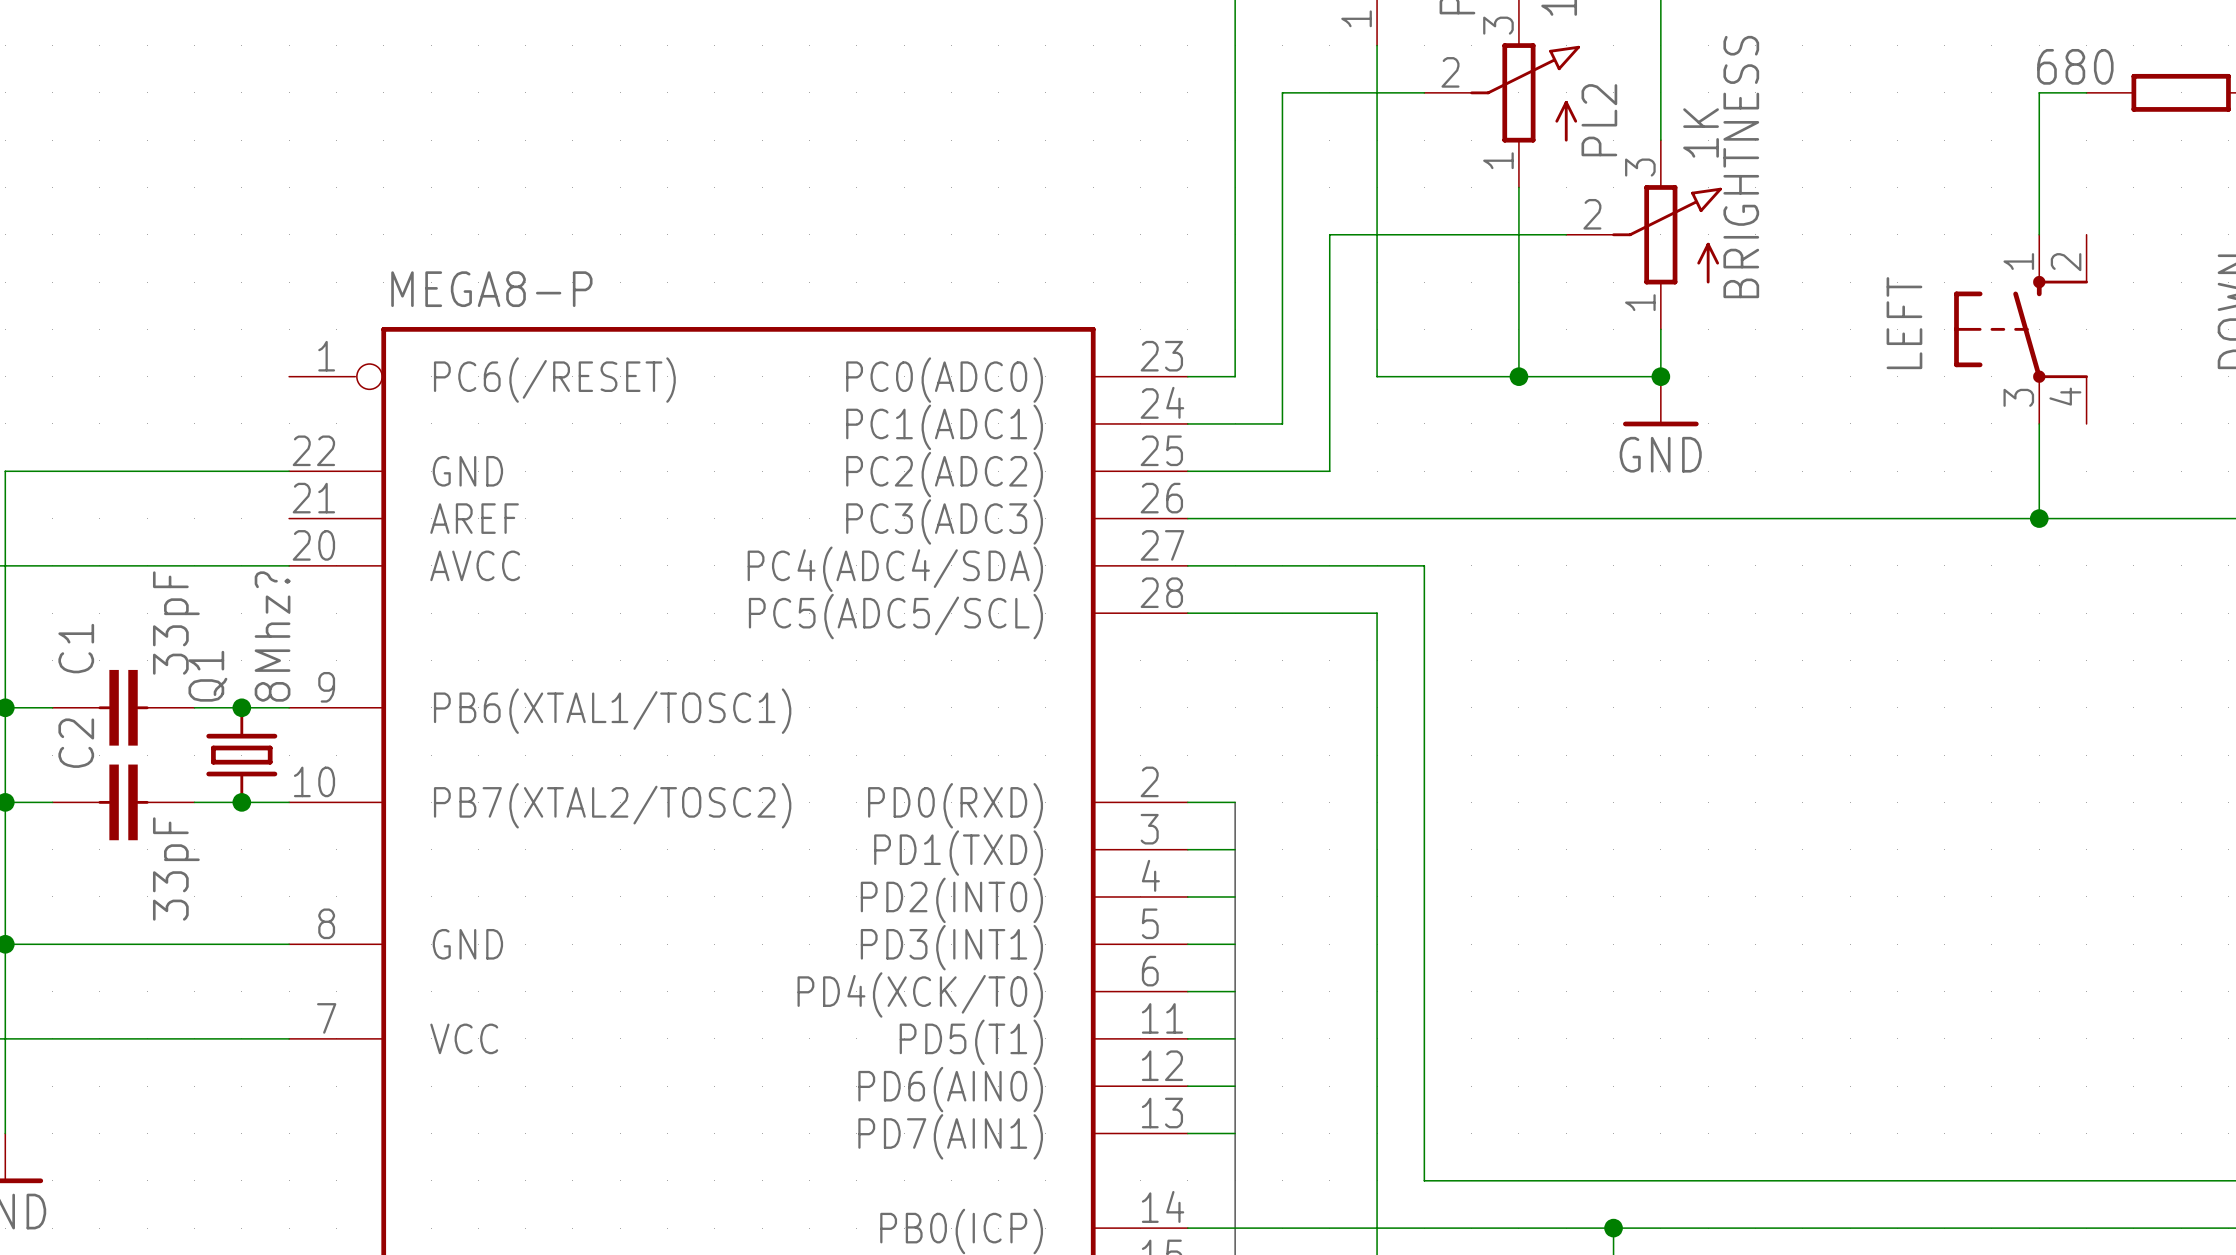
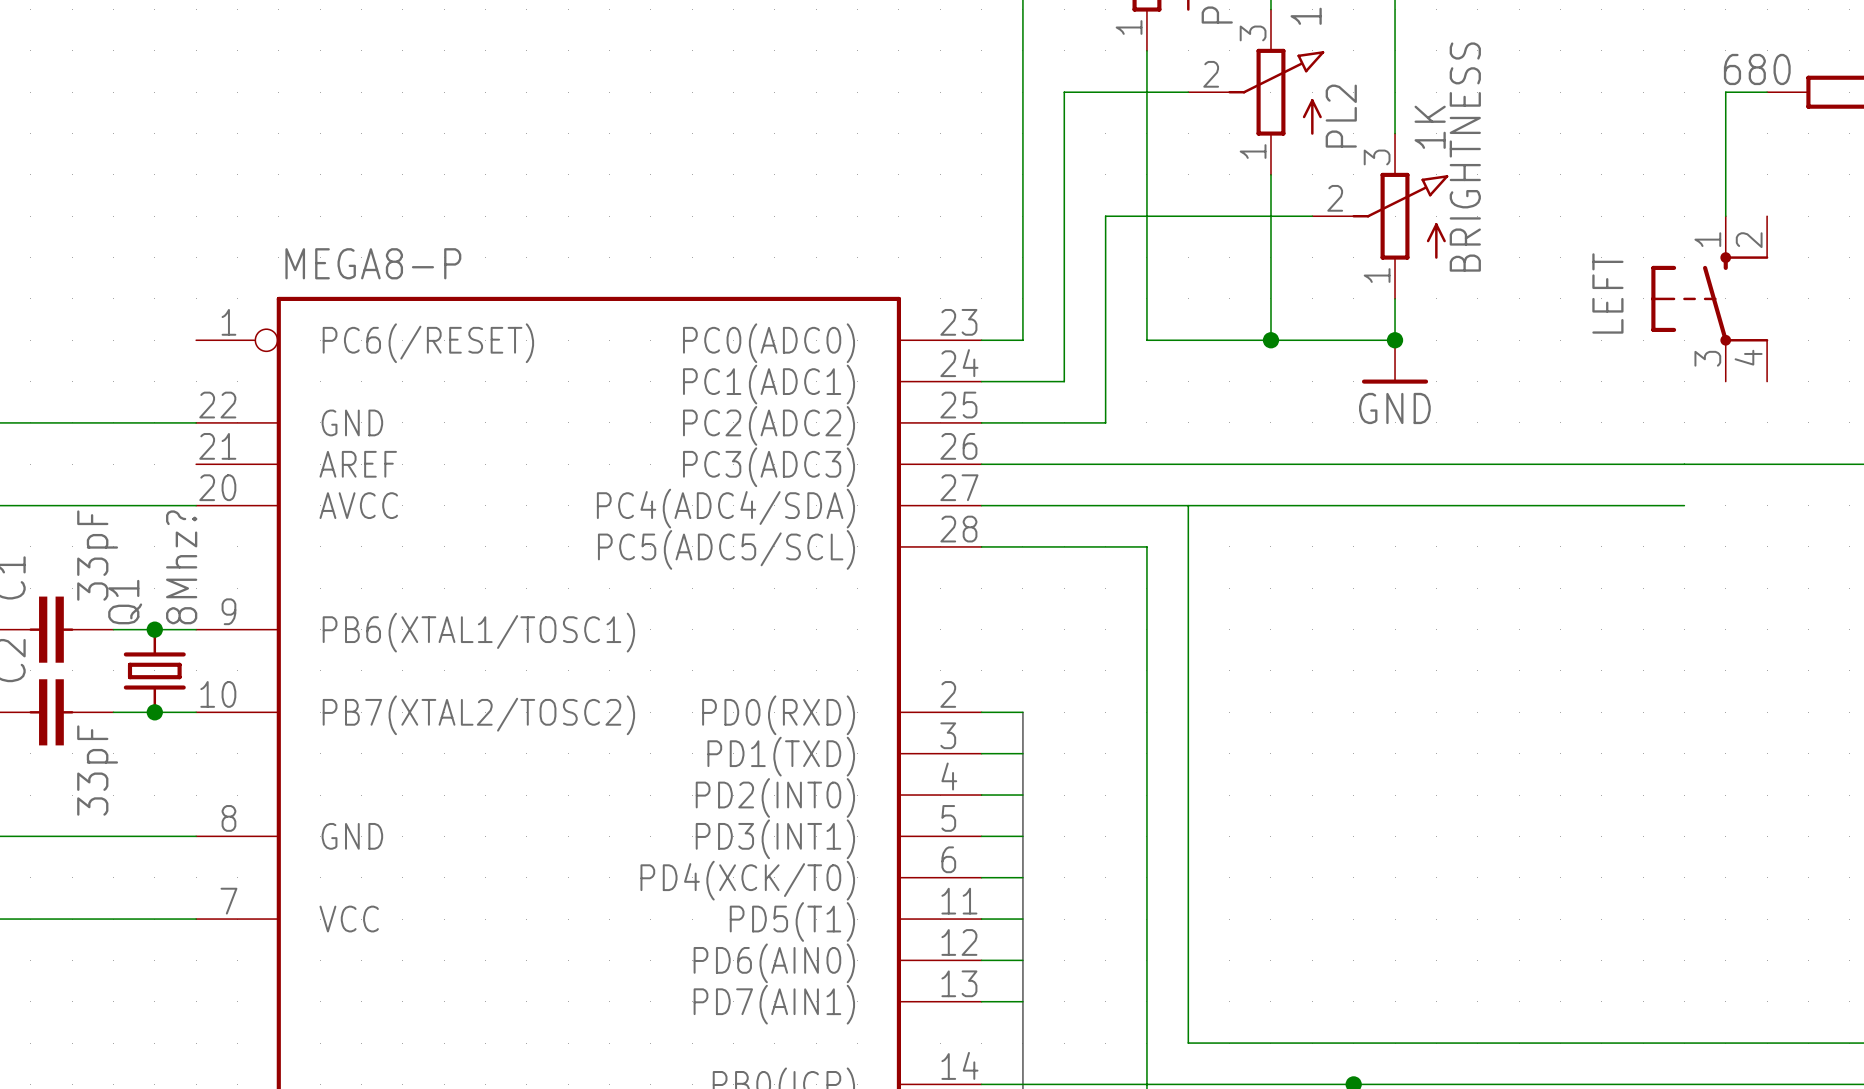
wire: (2039, 423) (2039, 518) -> none
junction: (2039, 518) -> none
wire: none -> (1188, 505) (1684, 505)

